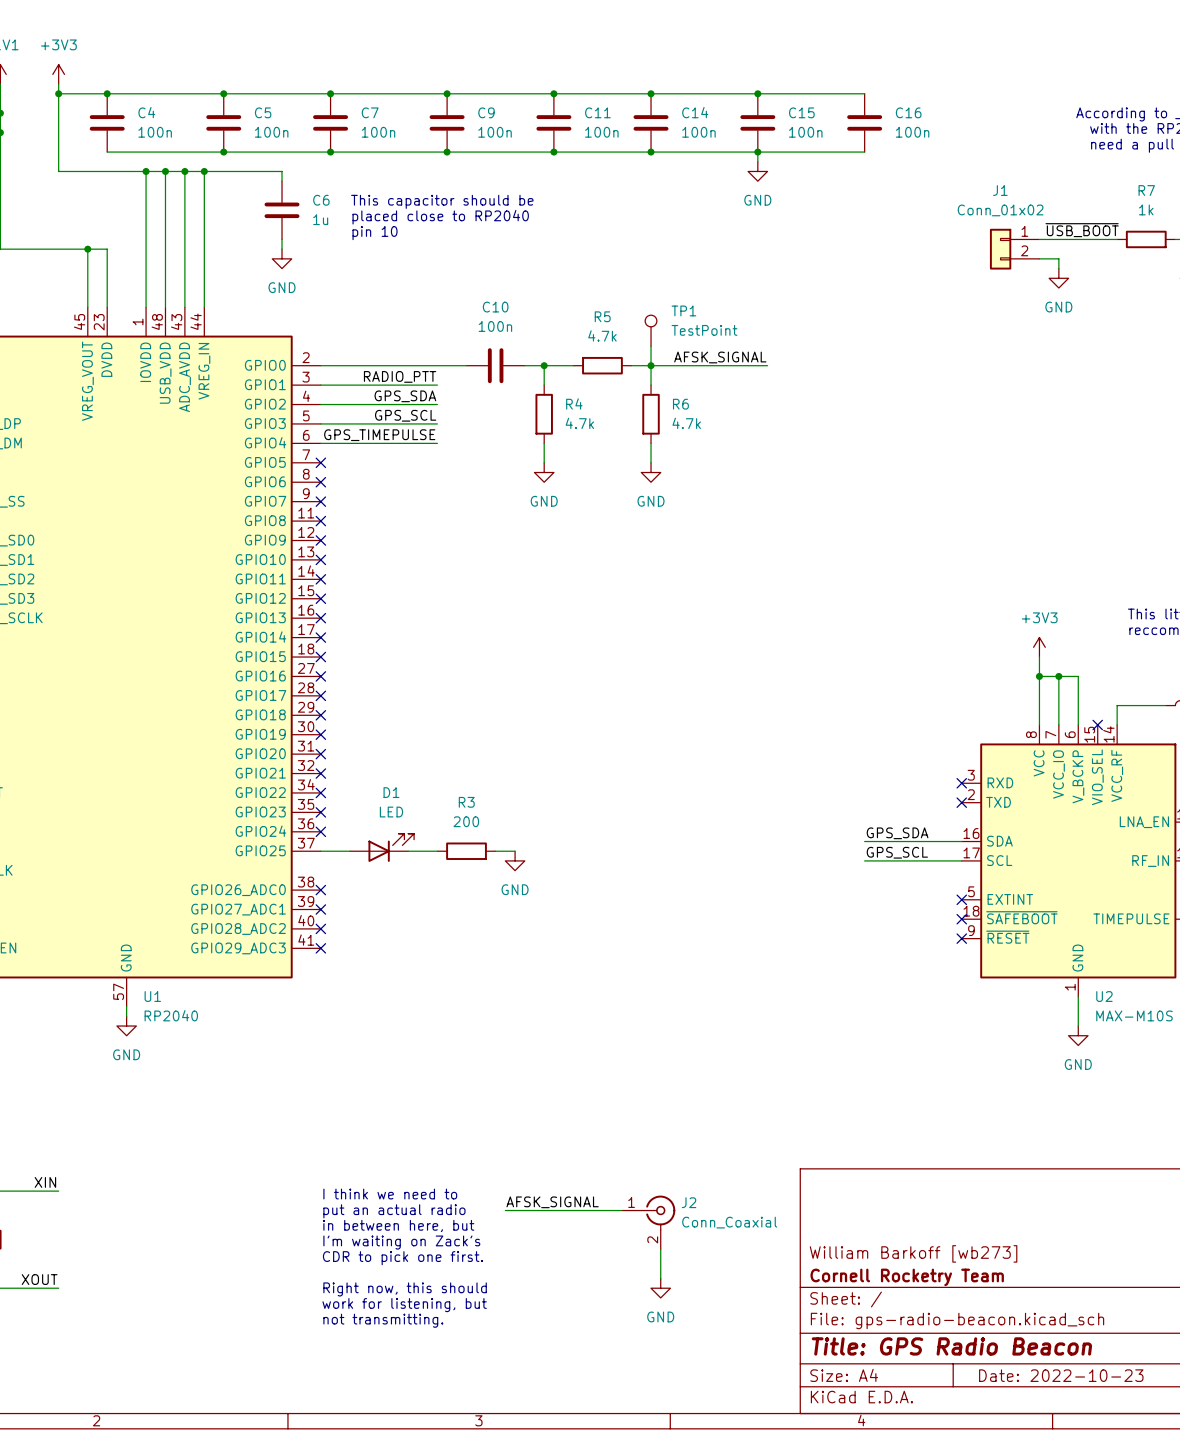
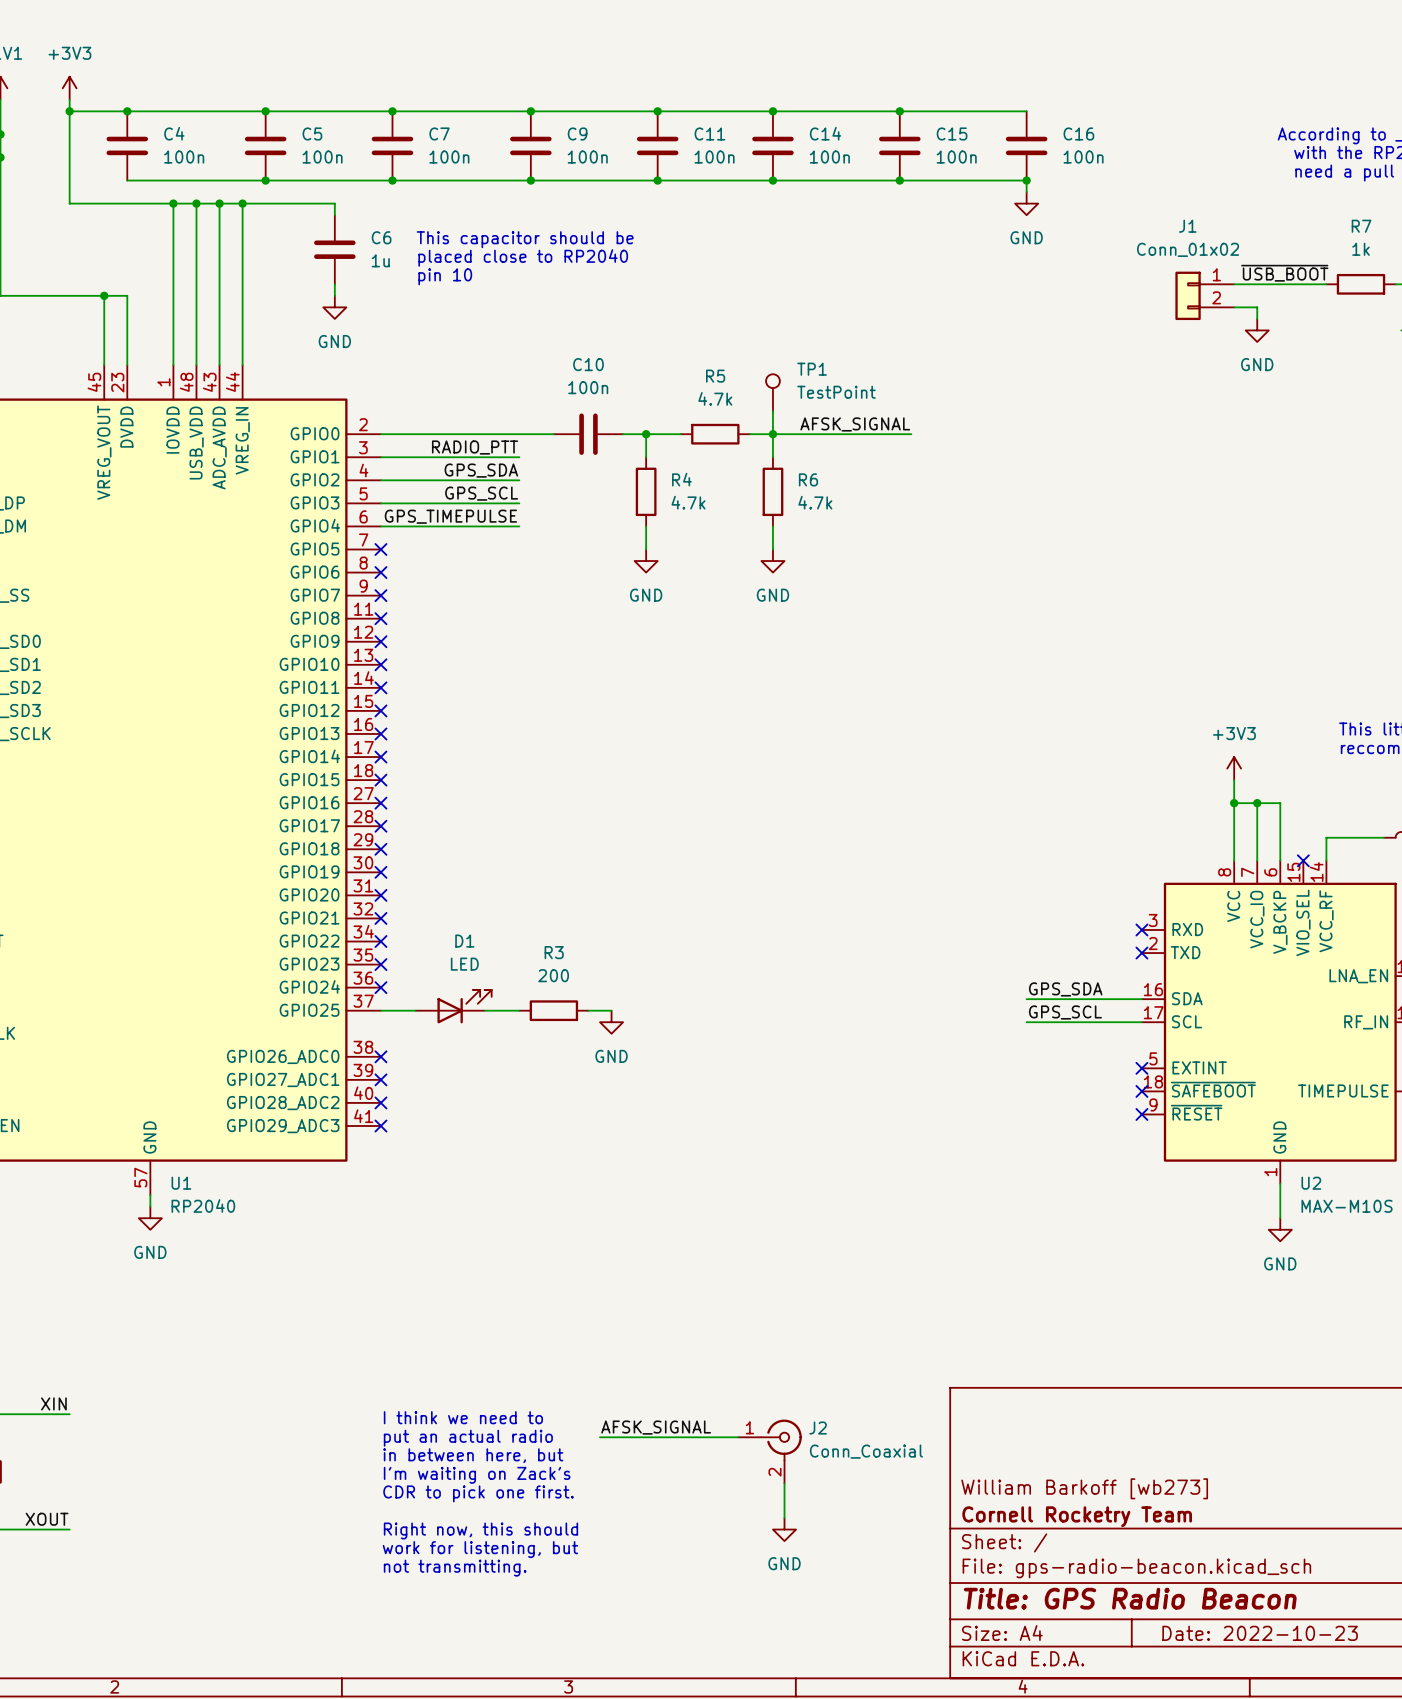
wire: (757, 152) (757, 161) -> (1026, 180) (1026, 192)
junction: none -> (1026, 180)
power symbol position: GND (757, 171) -> GND (1026, 203)

